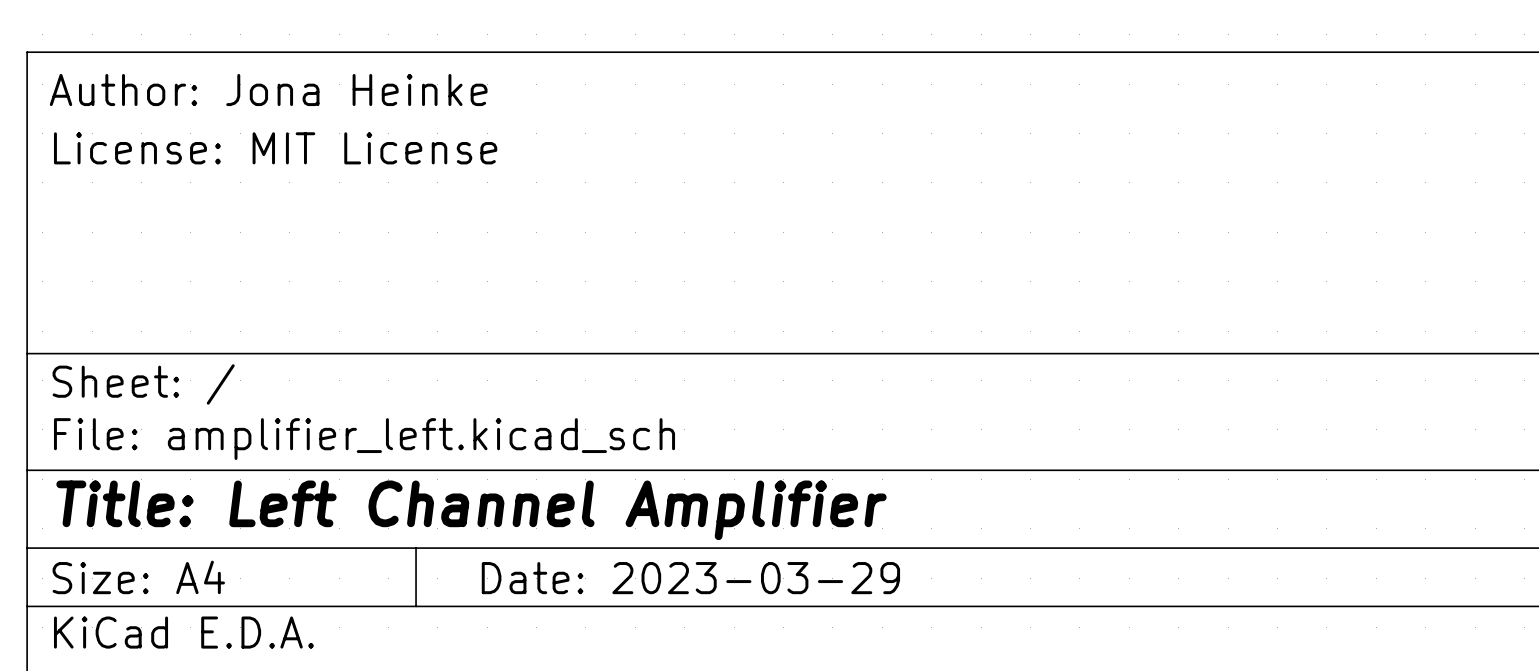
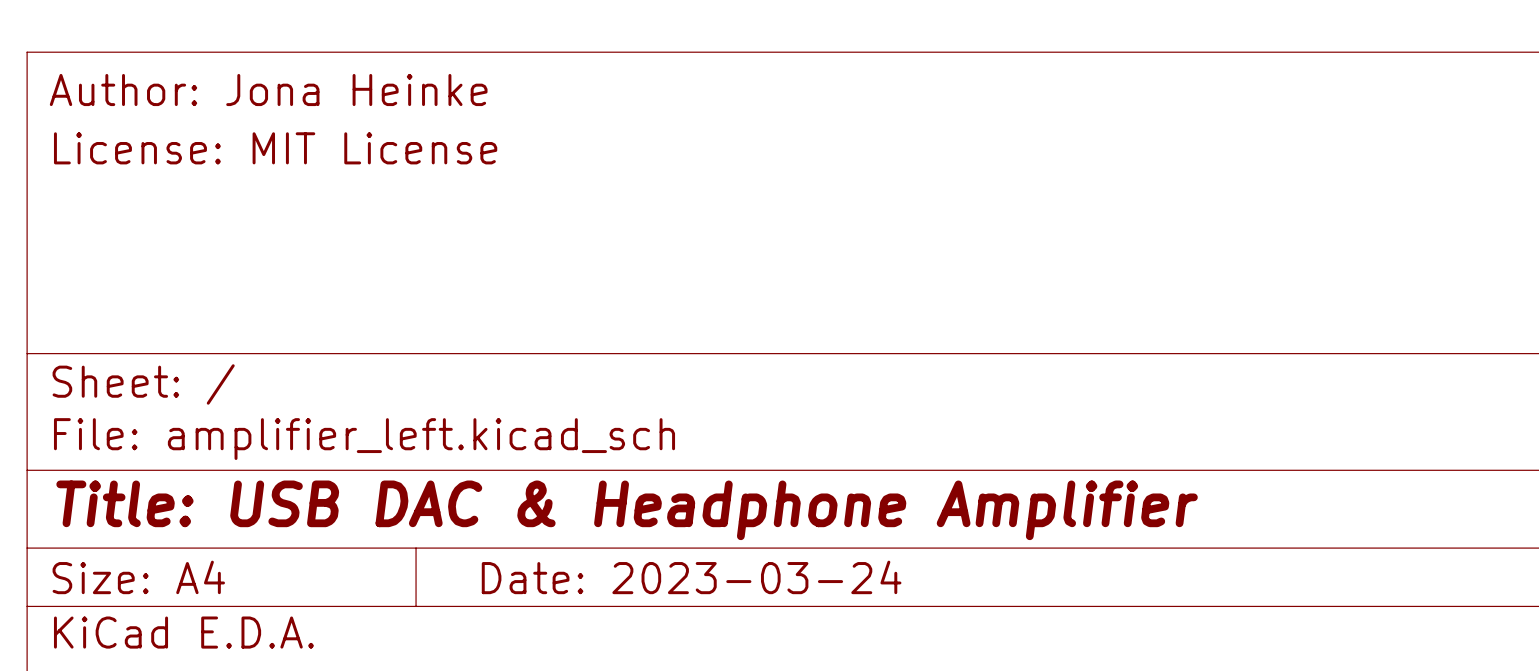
title block: Title: Left Channel Amplifier (471, 510) -> Title: USB DAC & Headphone Amplifier (627, 510)
title block: Date: 2023-03-29 (690, 578) -> Date: 2023-03-24 (691, 577)

